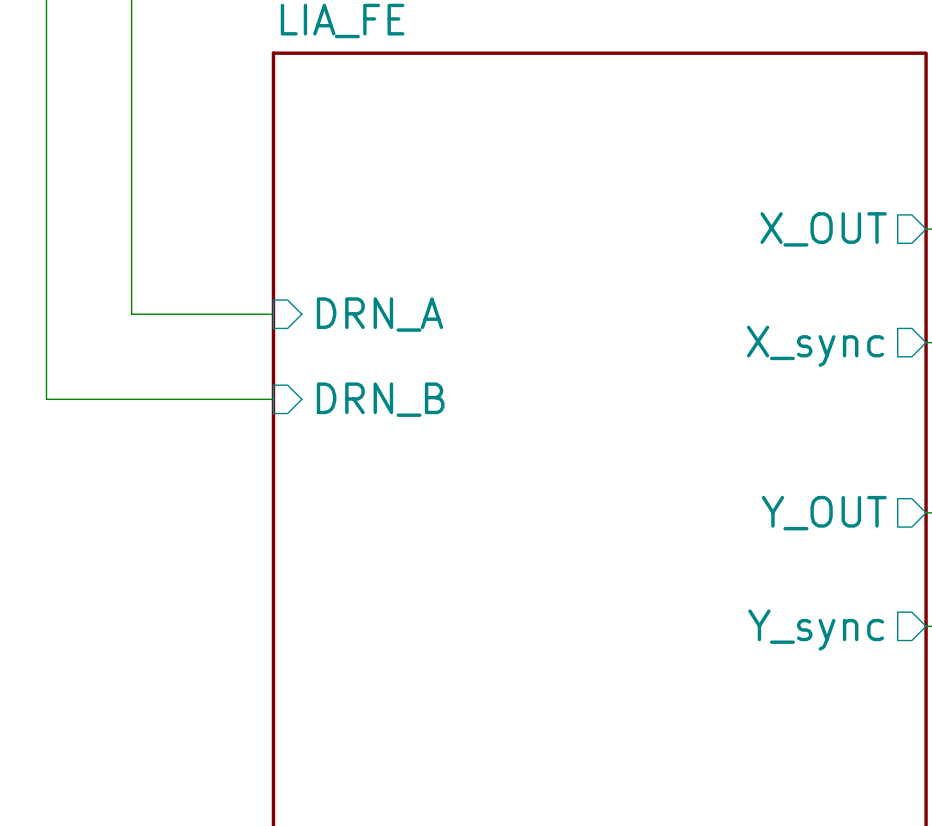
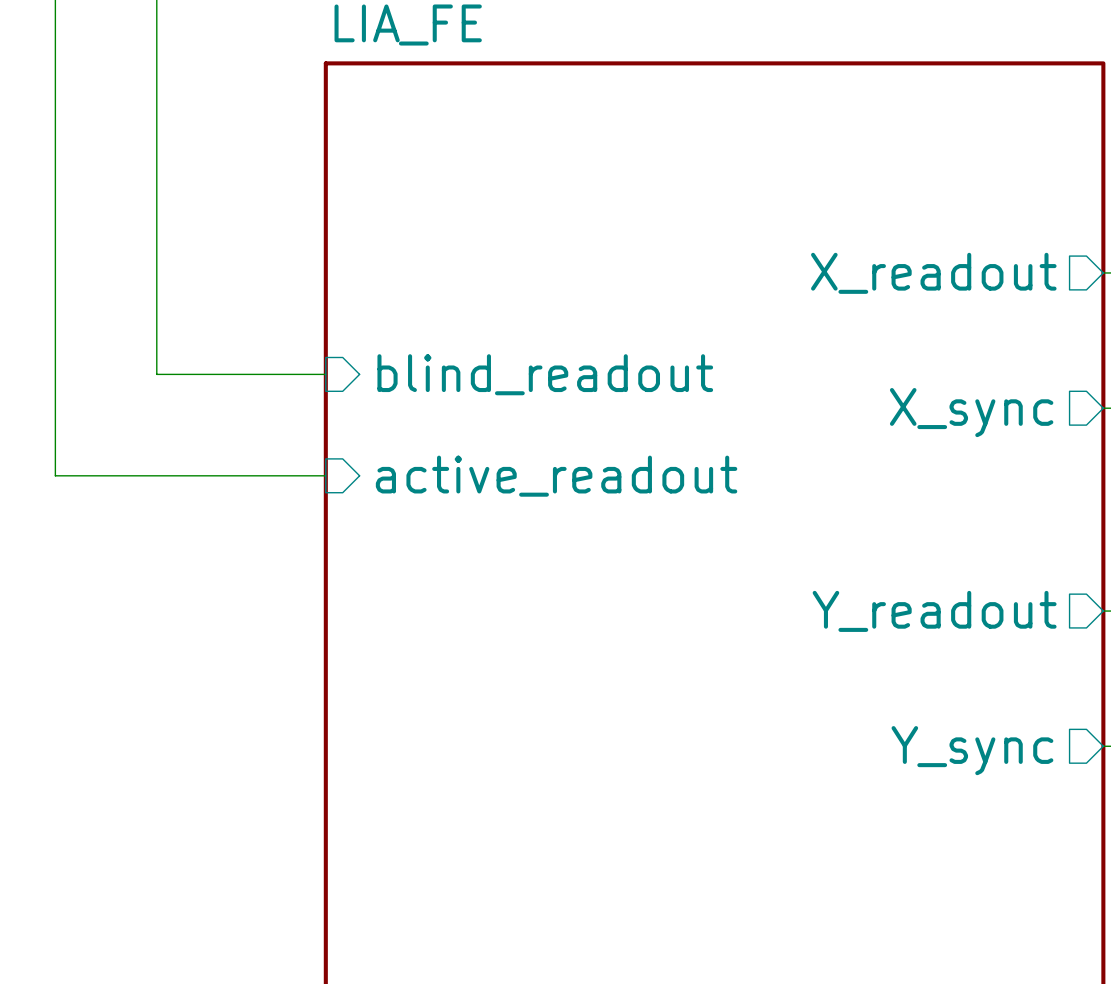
sheet pin: X_OUT (823, 229) -> X_readout (933, 273)
sheet pin: DRN_A (379, 314) -> blind_readout (545, 374)
sheet pin: DRN_B (380, 399) -> active_readout (556, 476)
sheet pin: Y_OUT (824, 513) -> Y_readout (934, 611)

